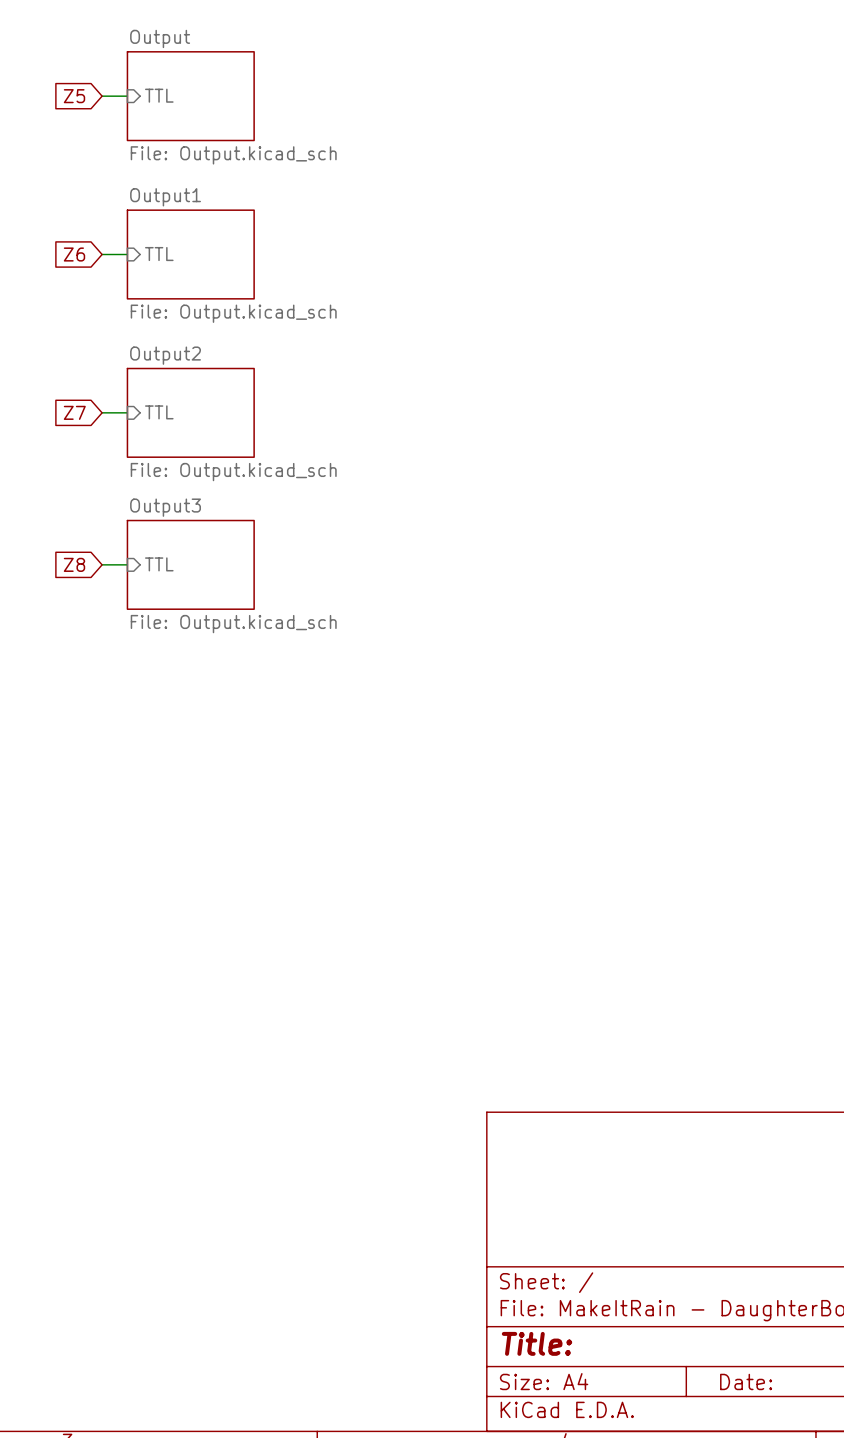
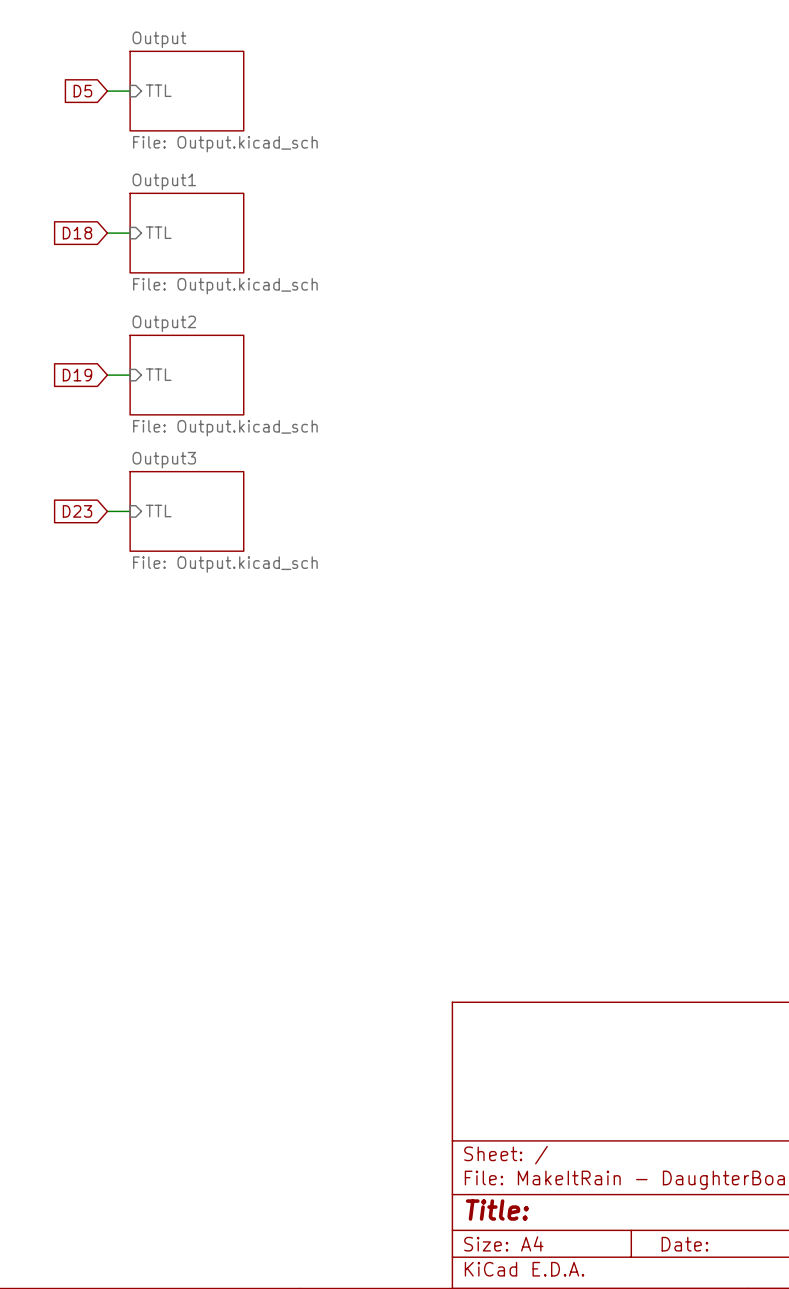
global label: Z5 (74, 96) -> D5 (82, 91)
global label: Z6 (74, 254) -> D18 (77, 233)
global label: Z7 (74, 412) -> D19 (77, 375)
global label: Z8 (74, 564) -> D23 (77, 511)

